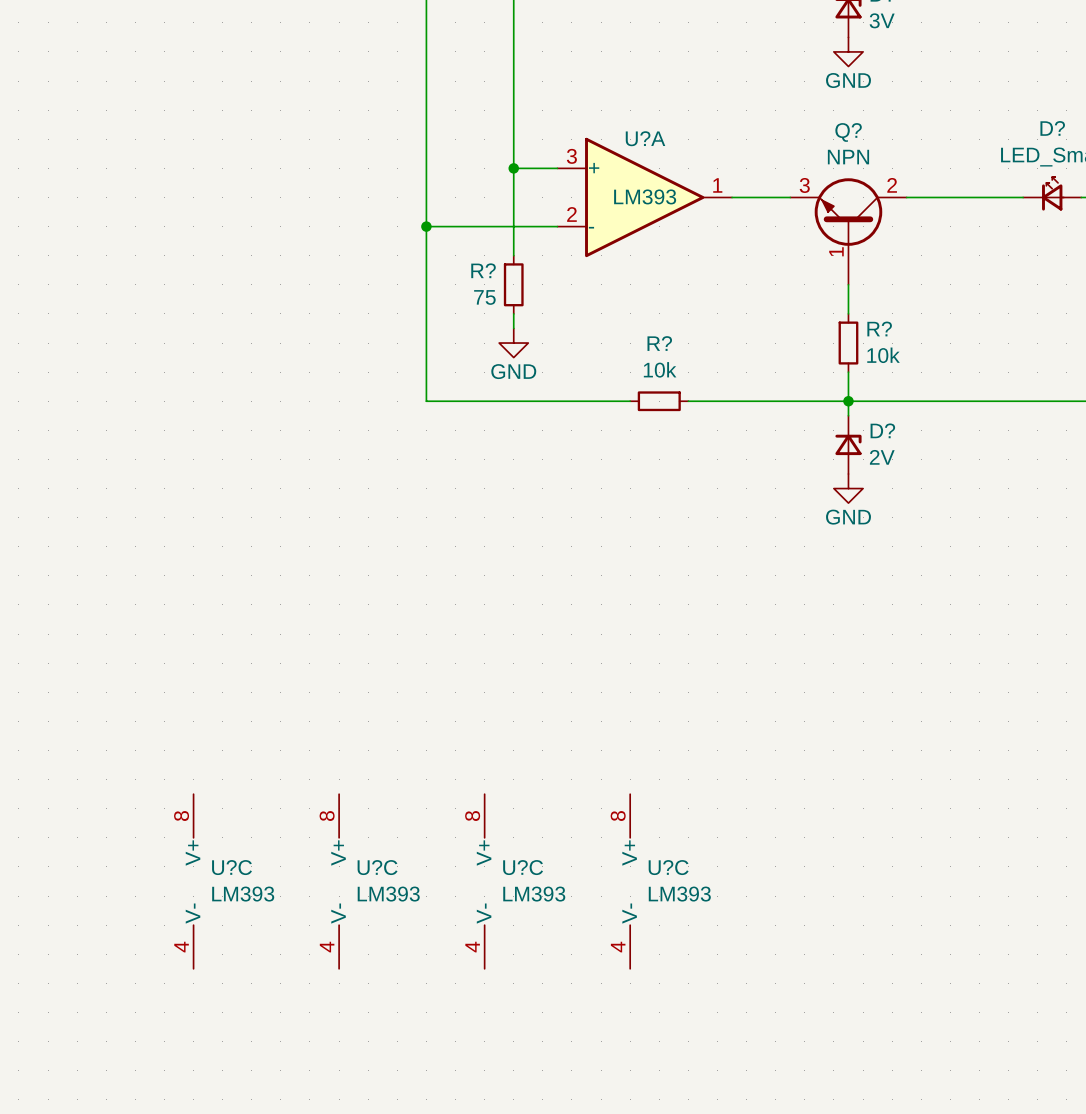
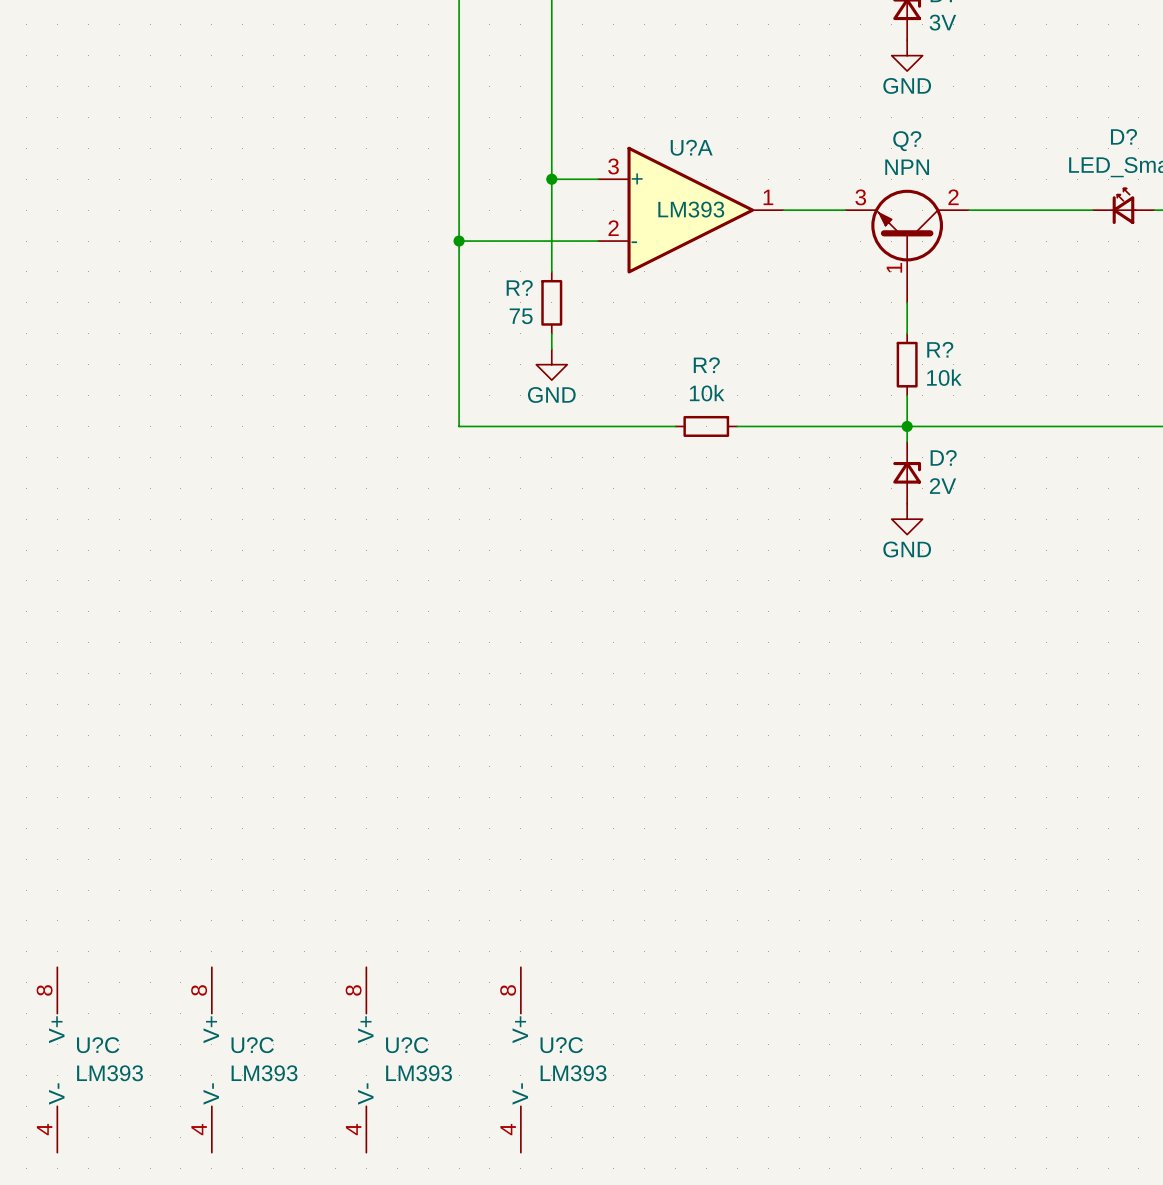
U?C: LM393 (193, 881) -> none
U?C: LM393 (339, 881) -> none
U?C: LM393 (484, 881) -> none
U?C: LM393 (630, 881) -> none
U?C: none -> LM393 (57, 1059)
U?C: none -> LM393 (211, 1059)
U?C: none -> LM393 (366, 1059)
U?C: none -> LM393 (520, 1059)

